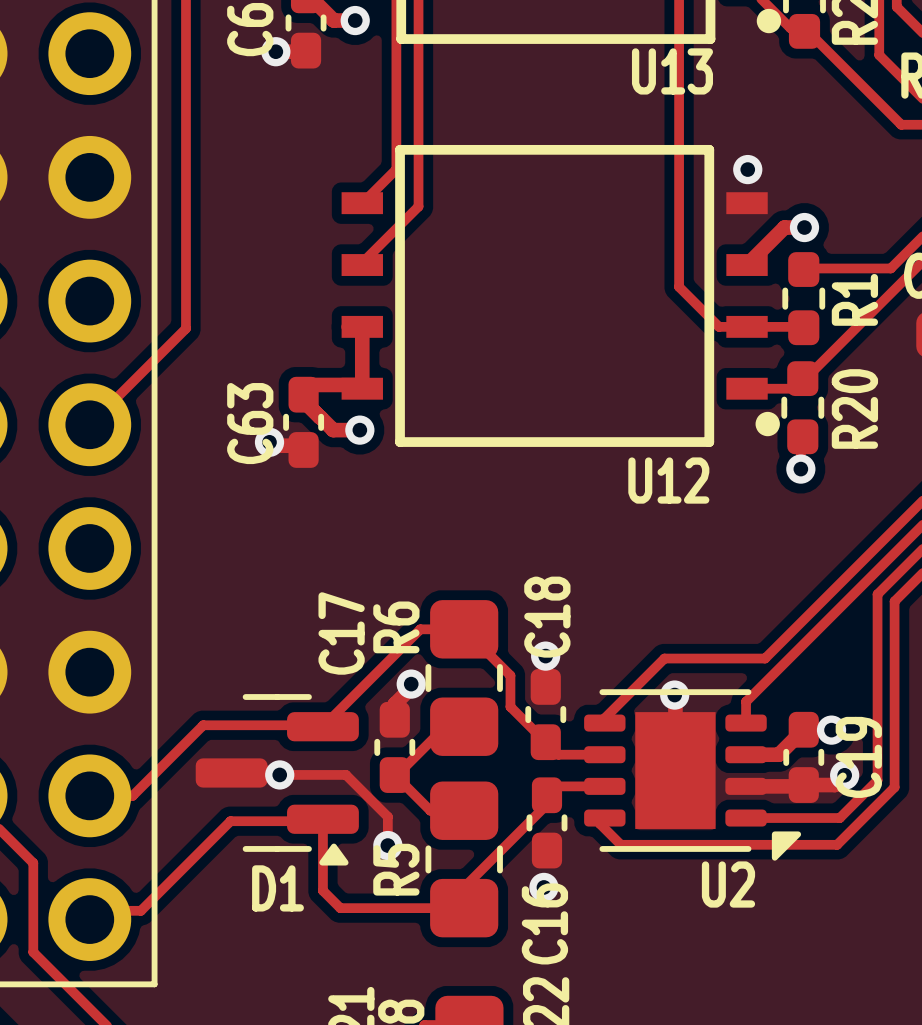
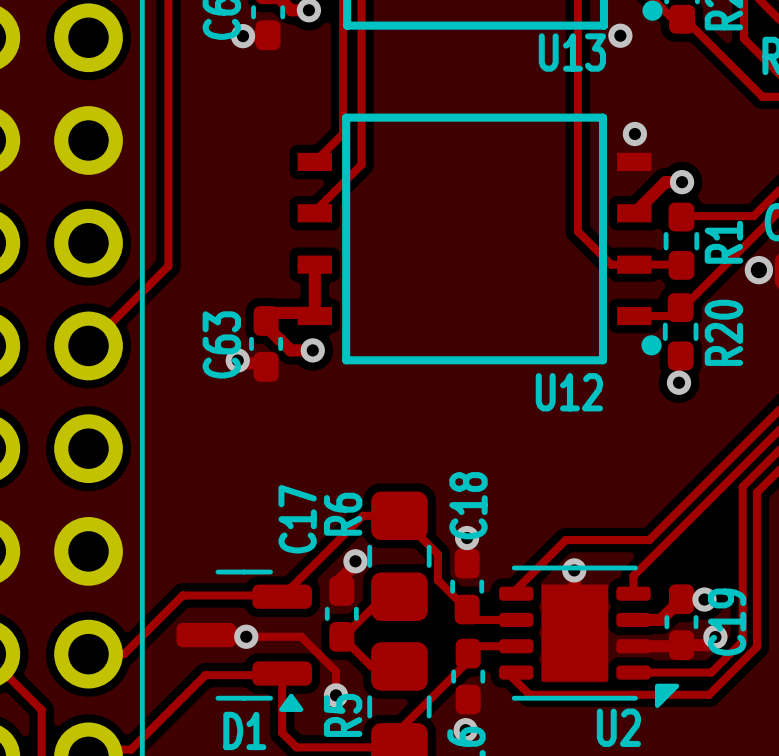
via: none -> (620, 35)
via: none -> (758, 270)

